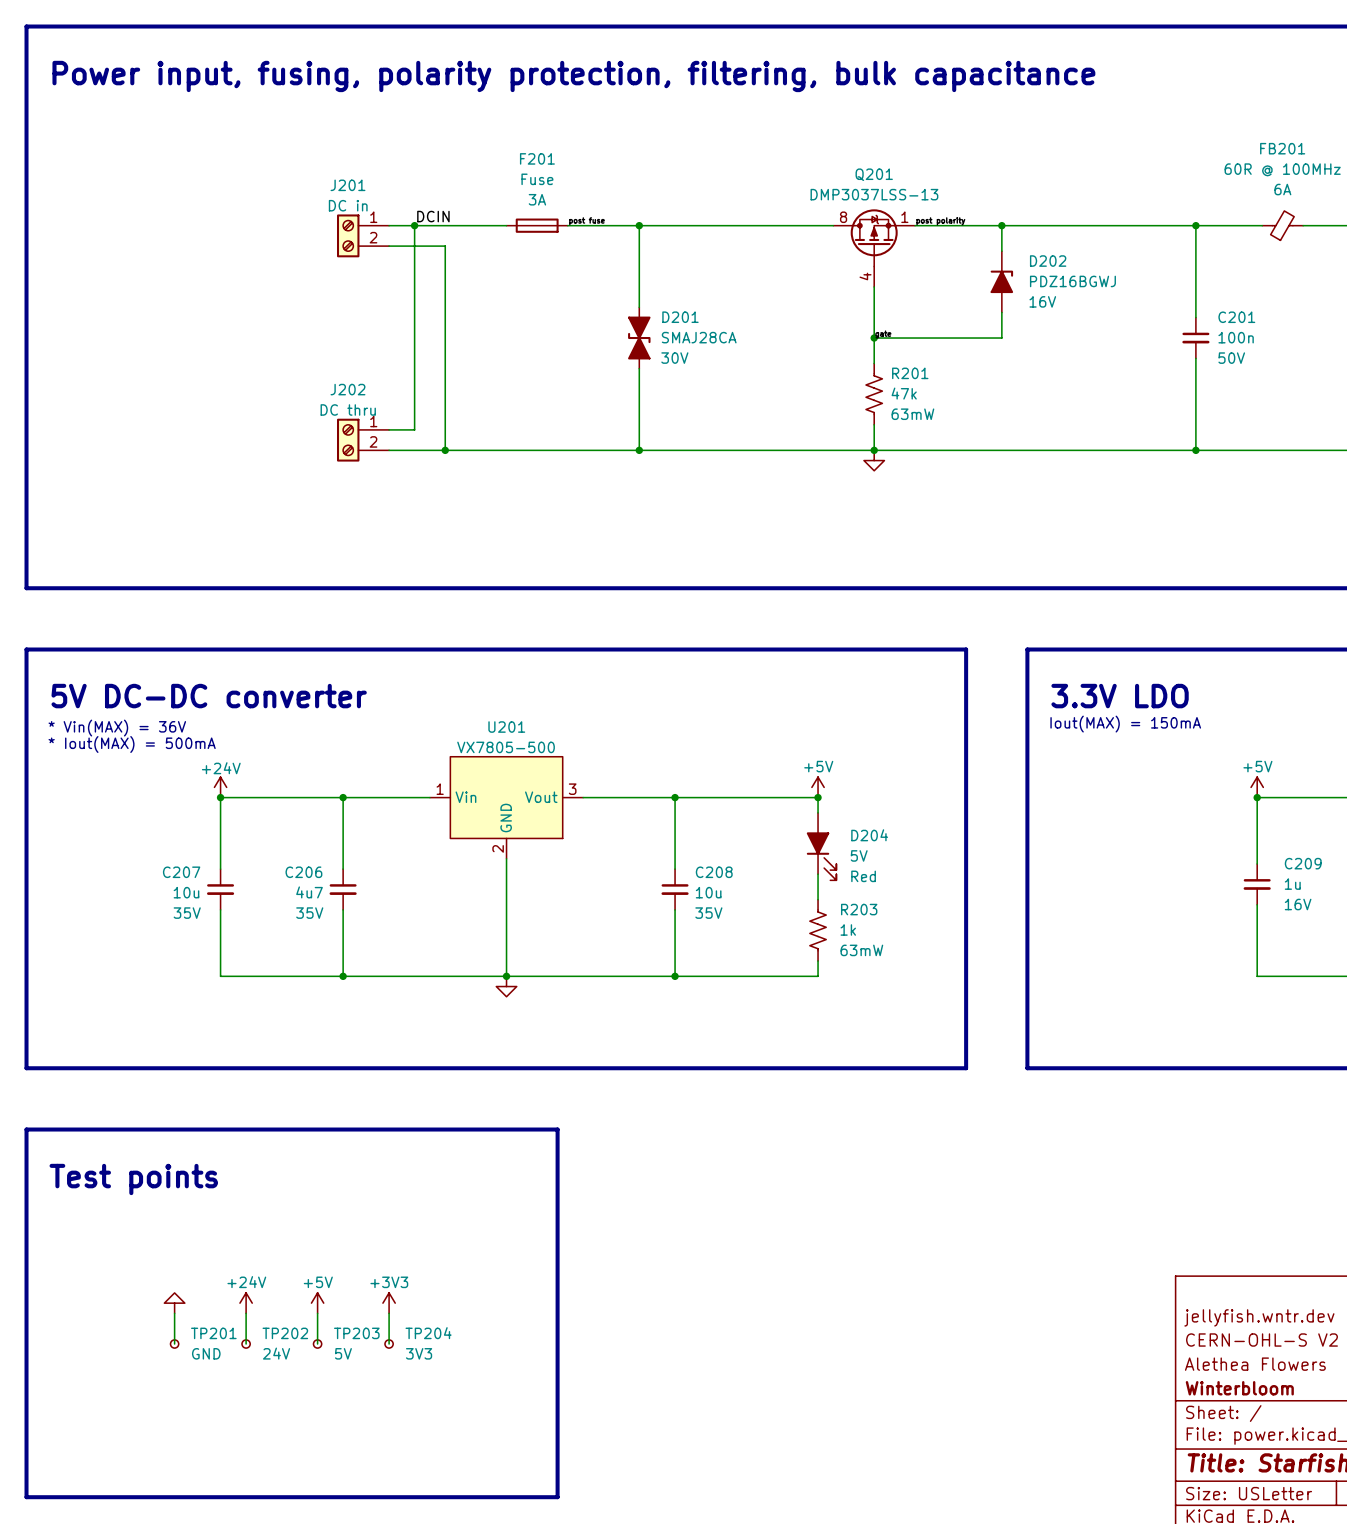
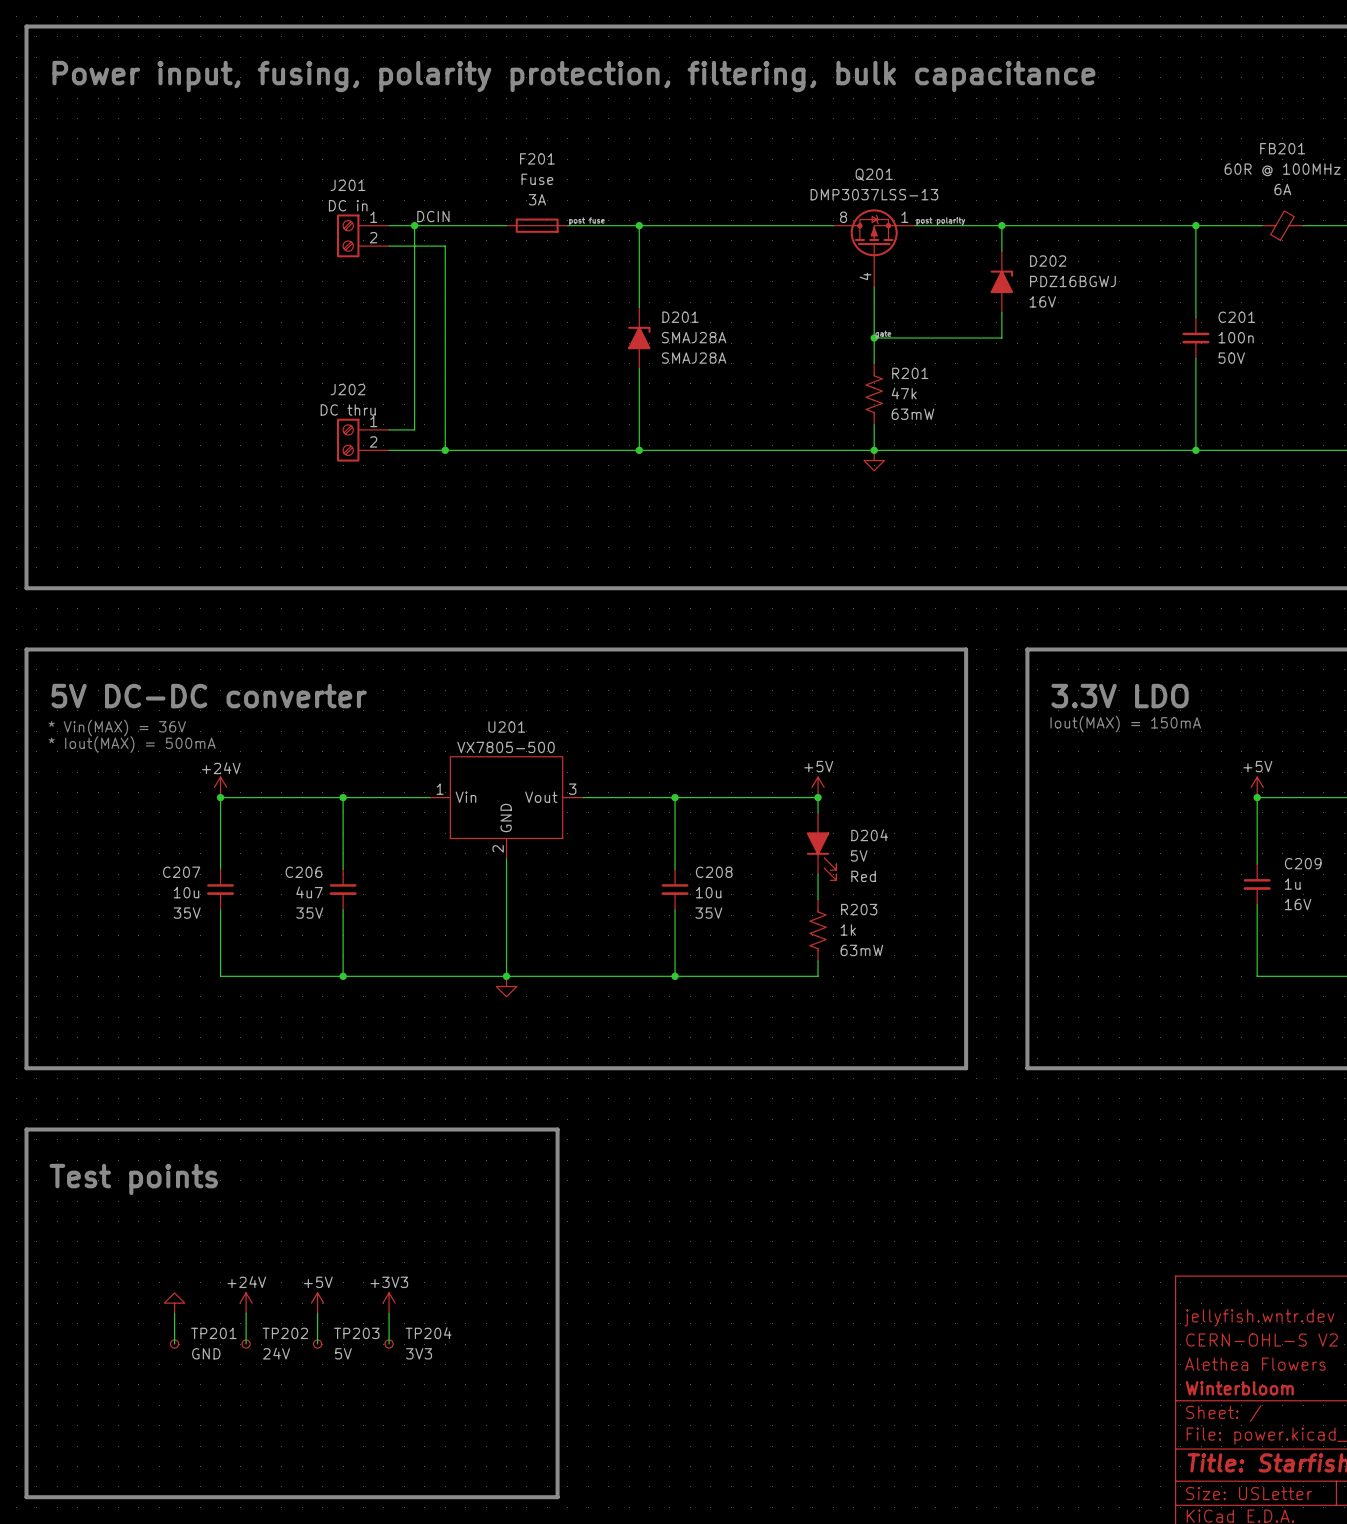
D201 symbol: [628, 307, 651, 369] -> [628, 307, 651, 369]
D201 value: SMAJ28CA (699, 337) -> SMAJ28A (694, 337)
D201 text: 30V (674, 358) -> none
D201 text: none -> SMAJ28A (694, 358)

